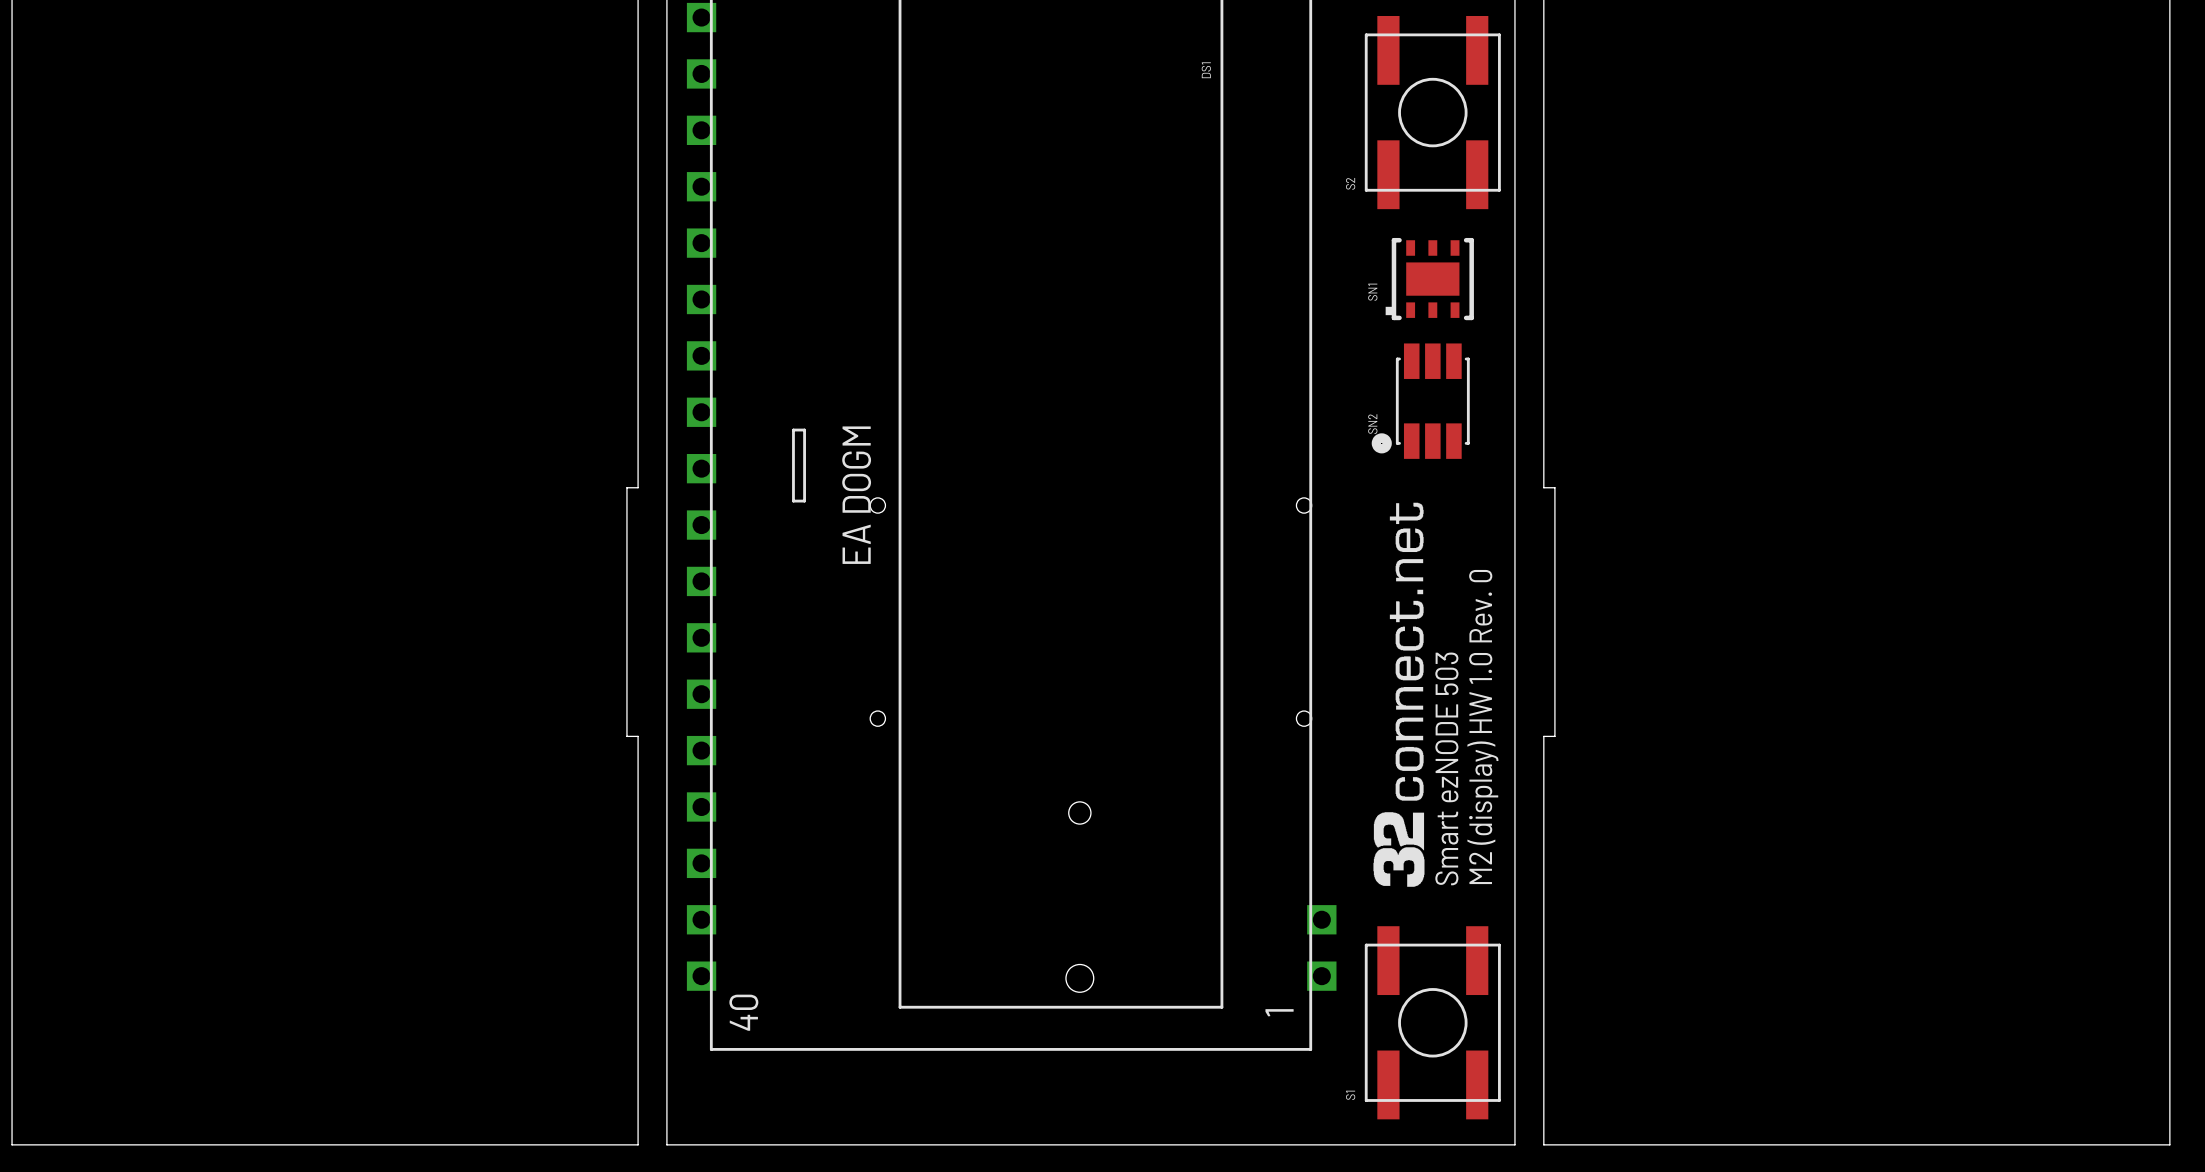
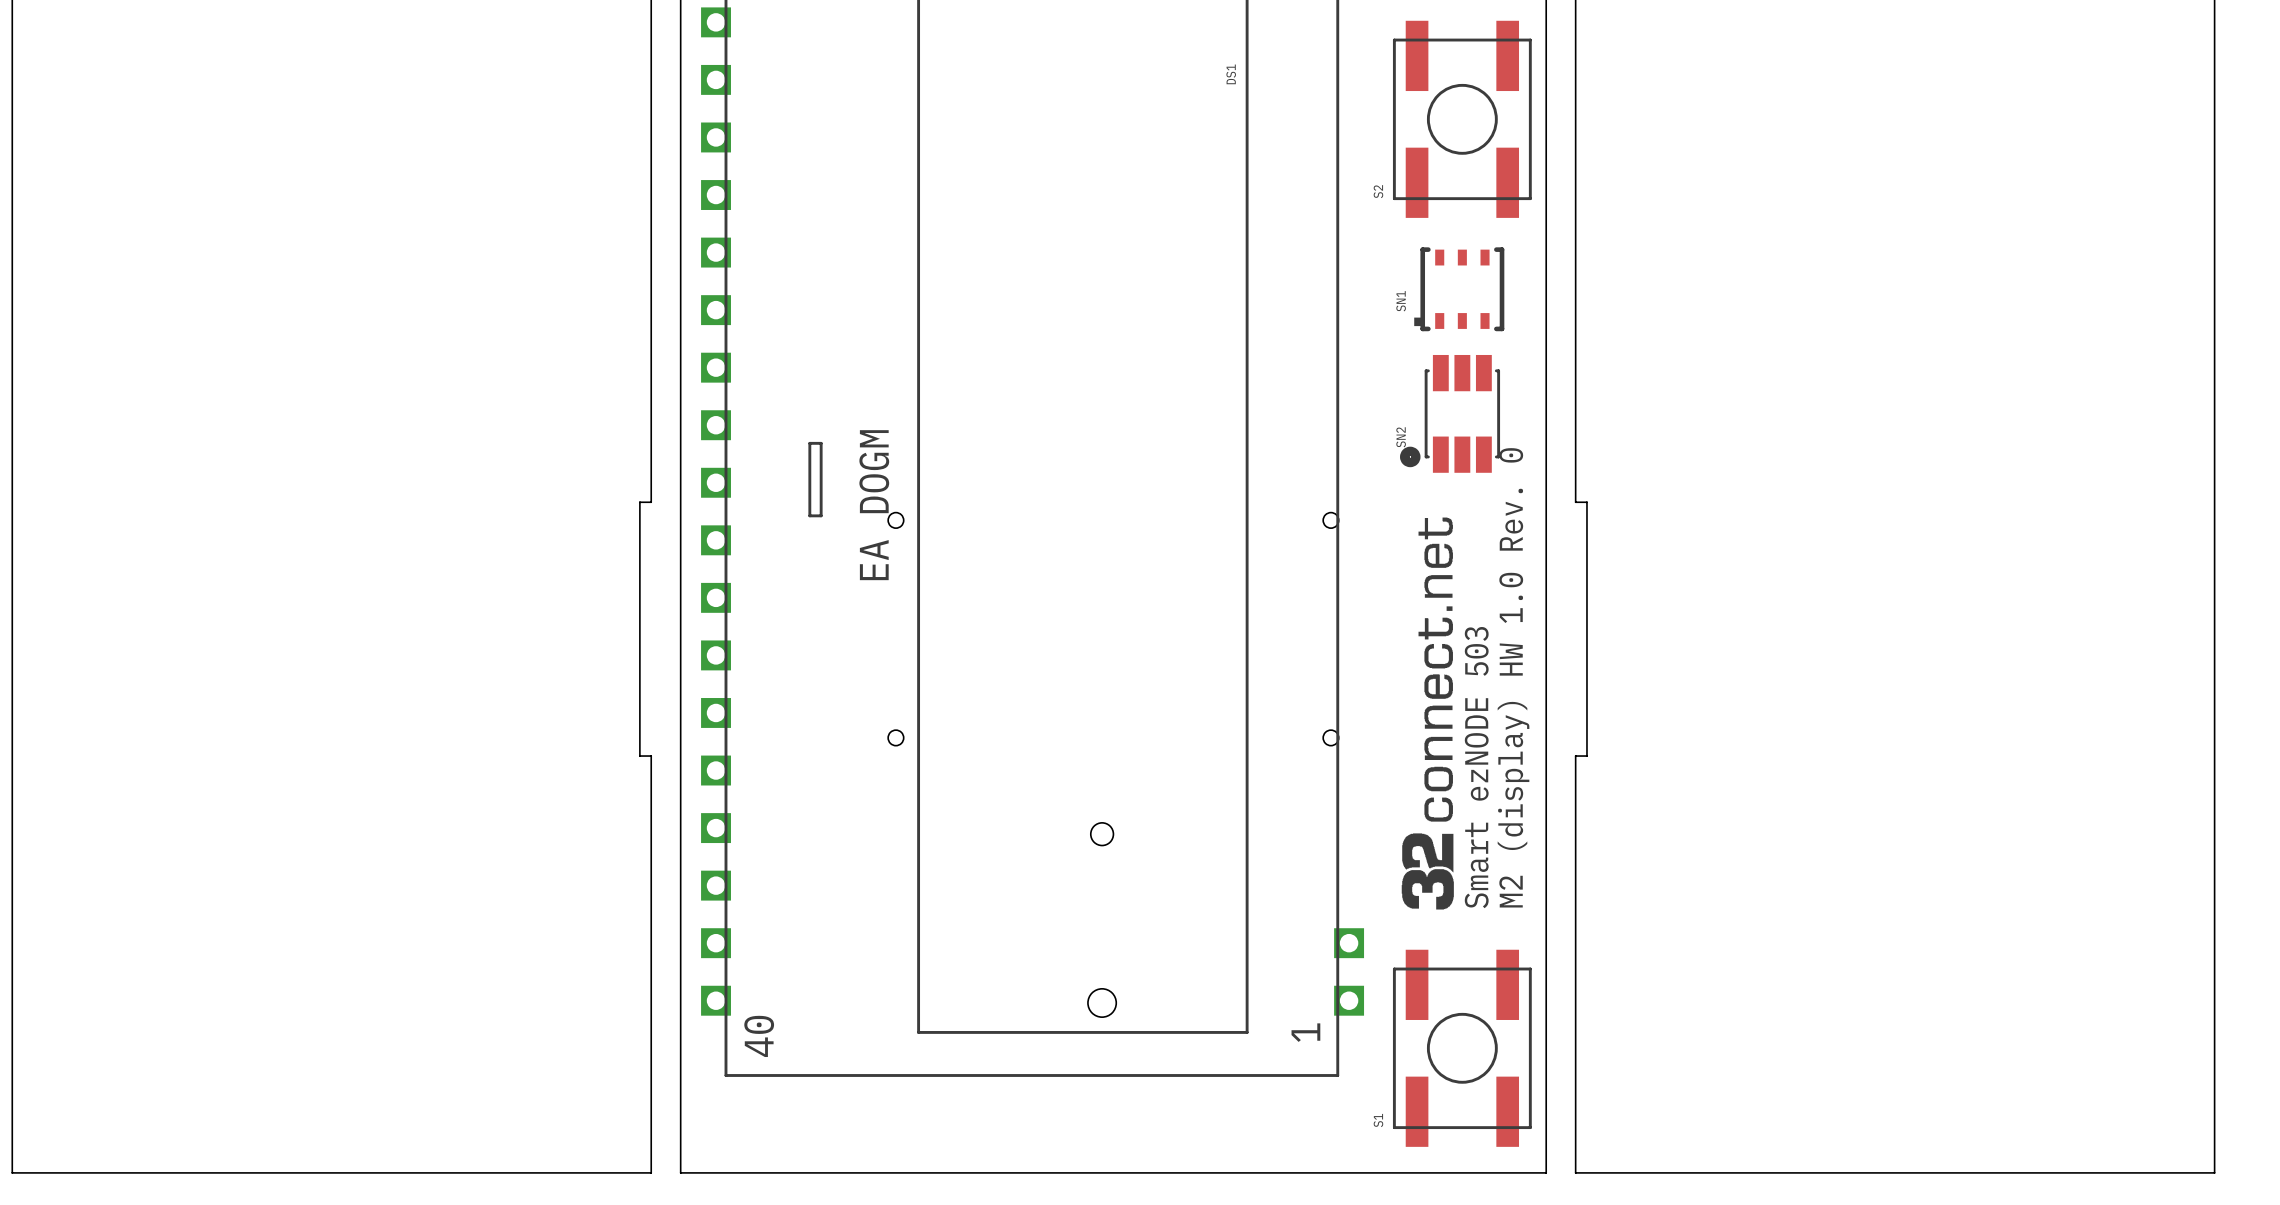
SN1 footprint: [1385, 237, 1474, 321] -> [1414, 247, 1505, 332]

